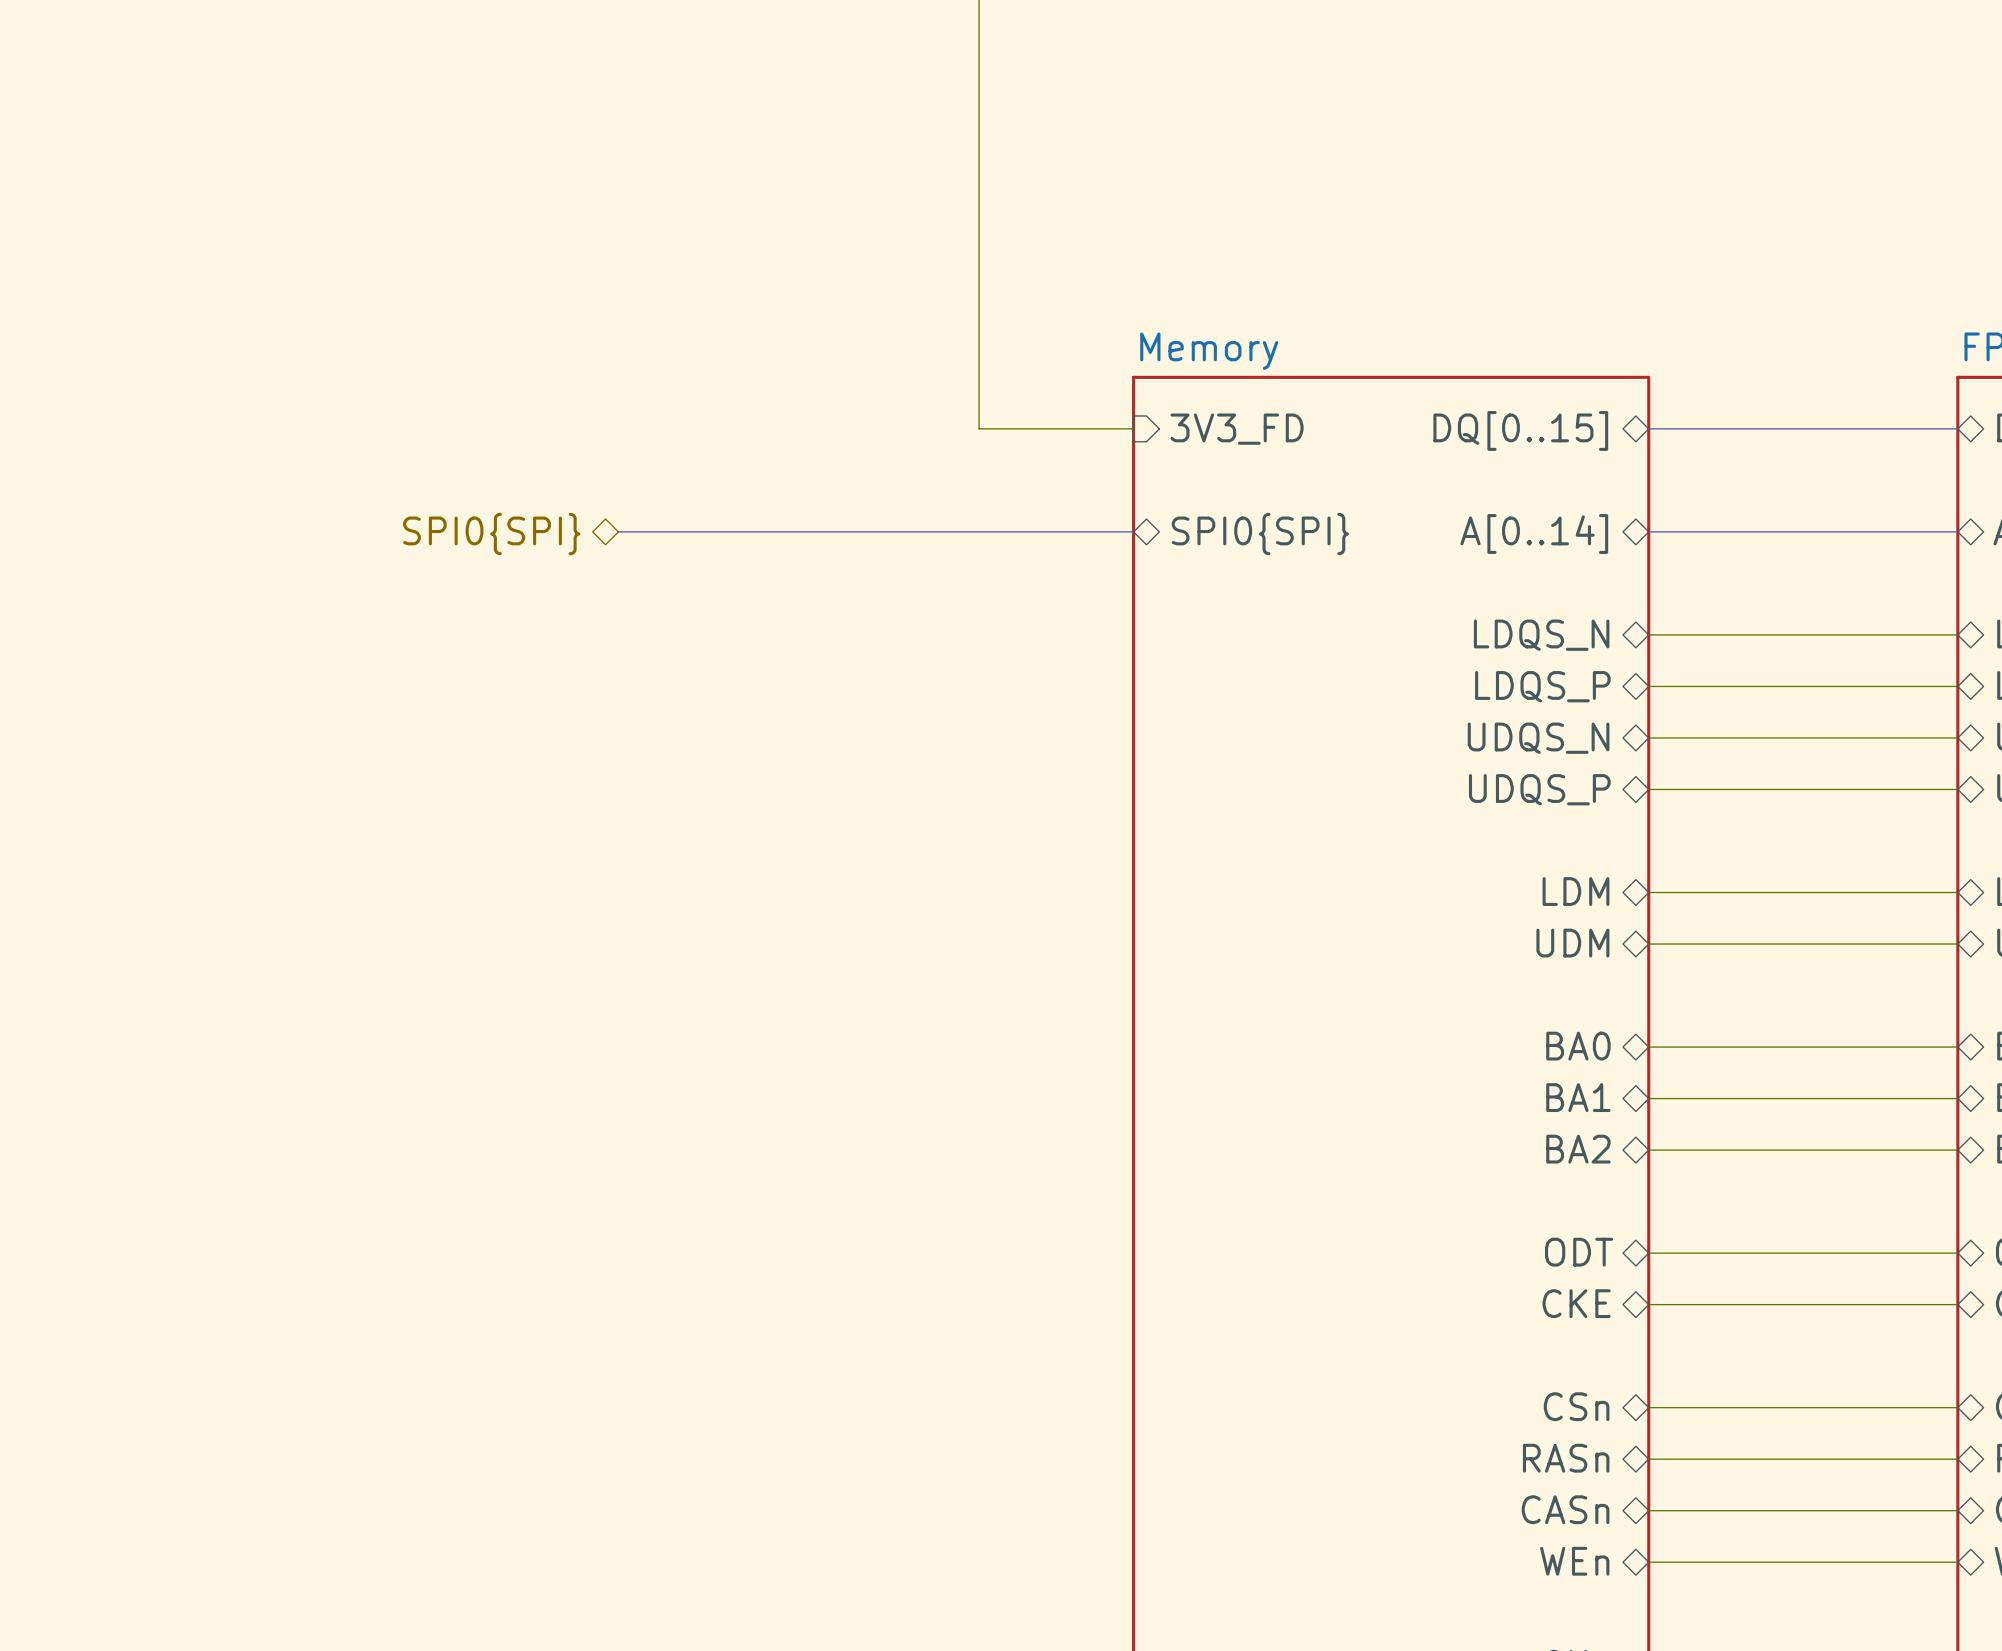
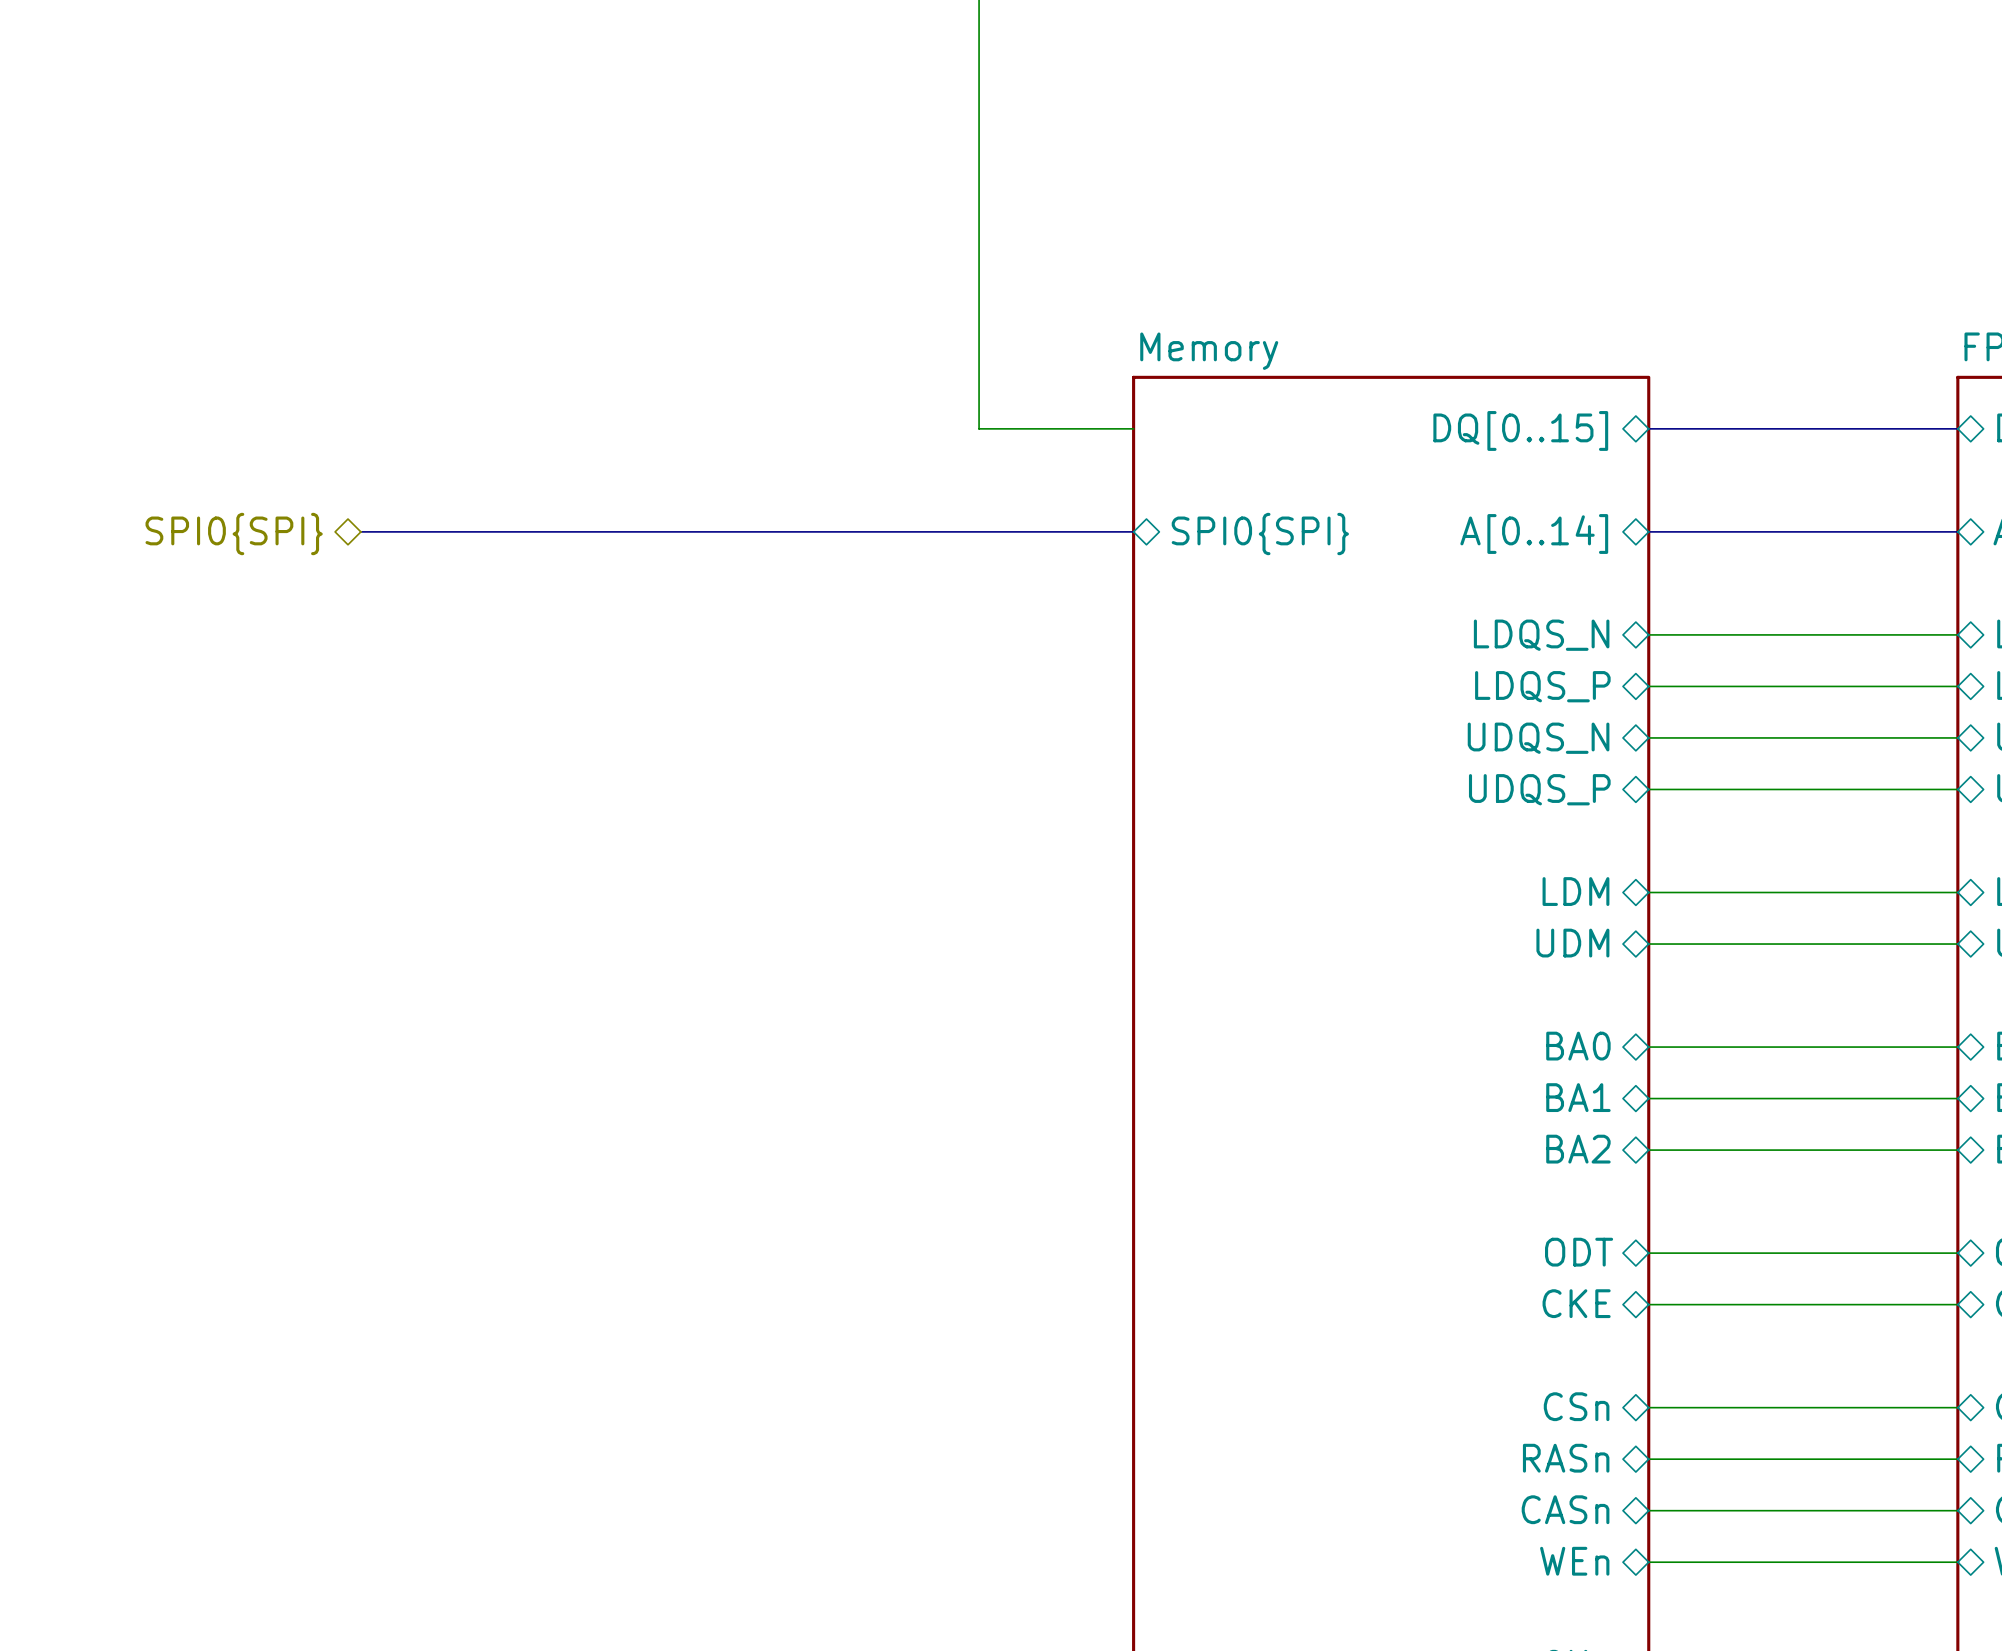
sheet pin: 3V3_FD (1237, 429) -> none
bus: none -> (360, 531) (618, 531)
hierarchical label position: SPI0{SPI} (491, 534) -> SPI0{SPI} (234, 534)

